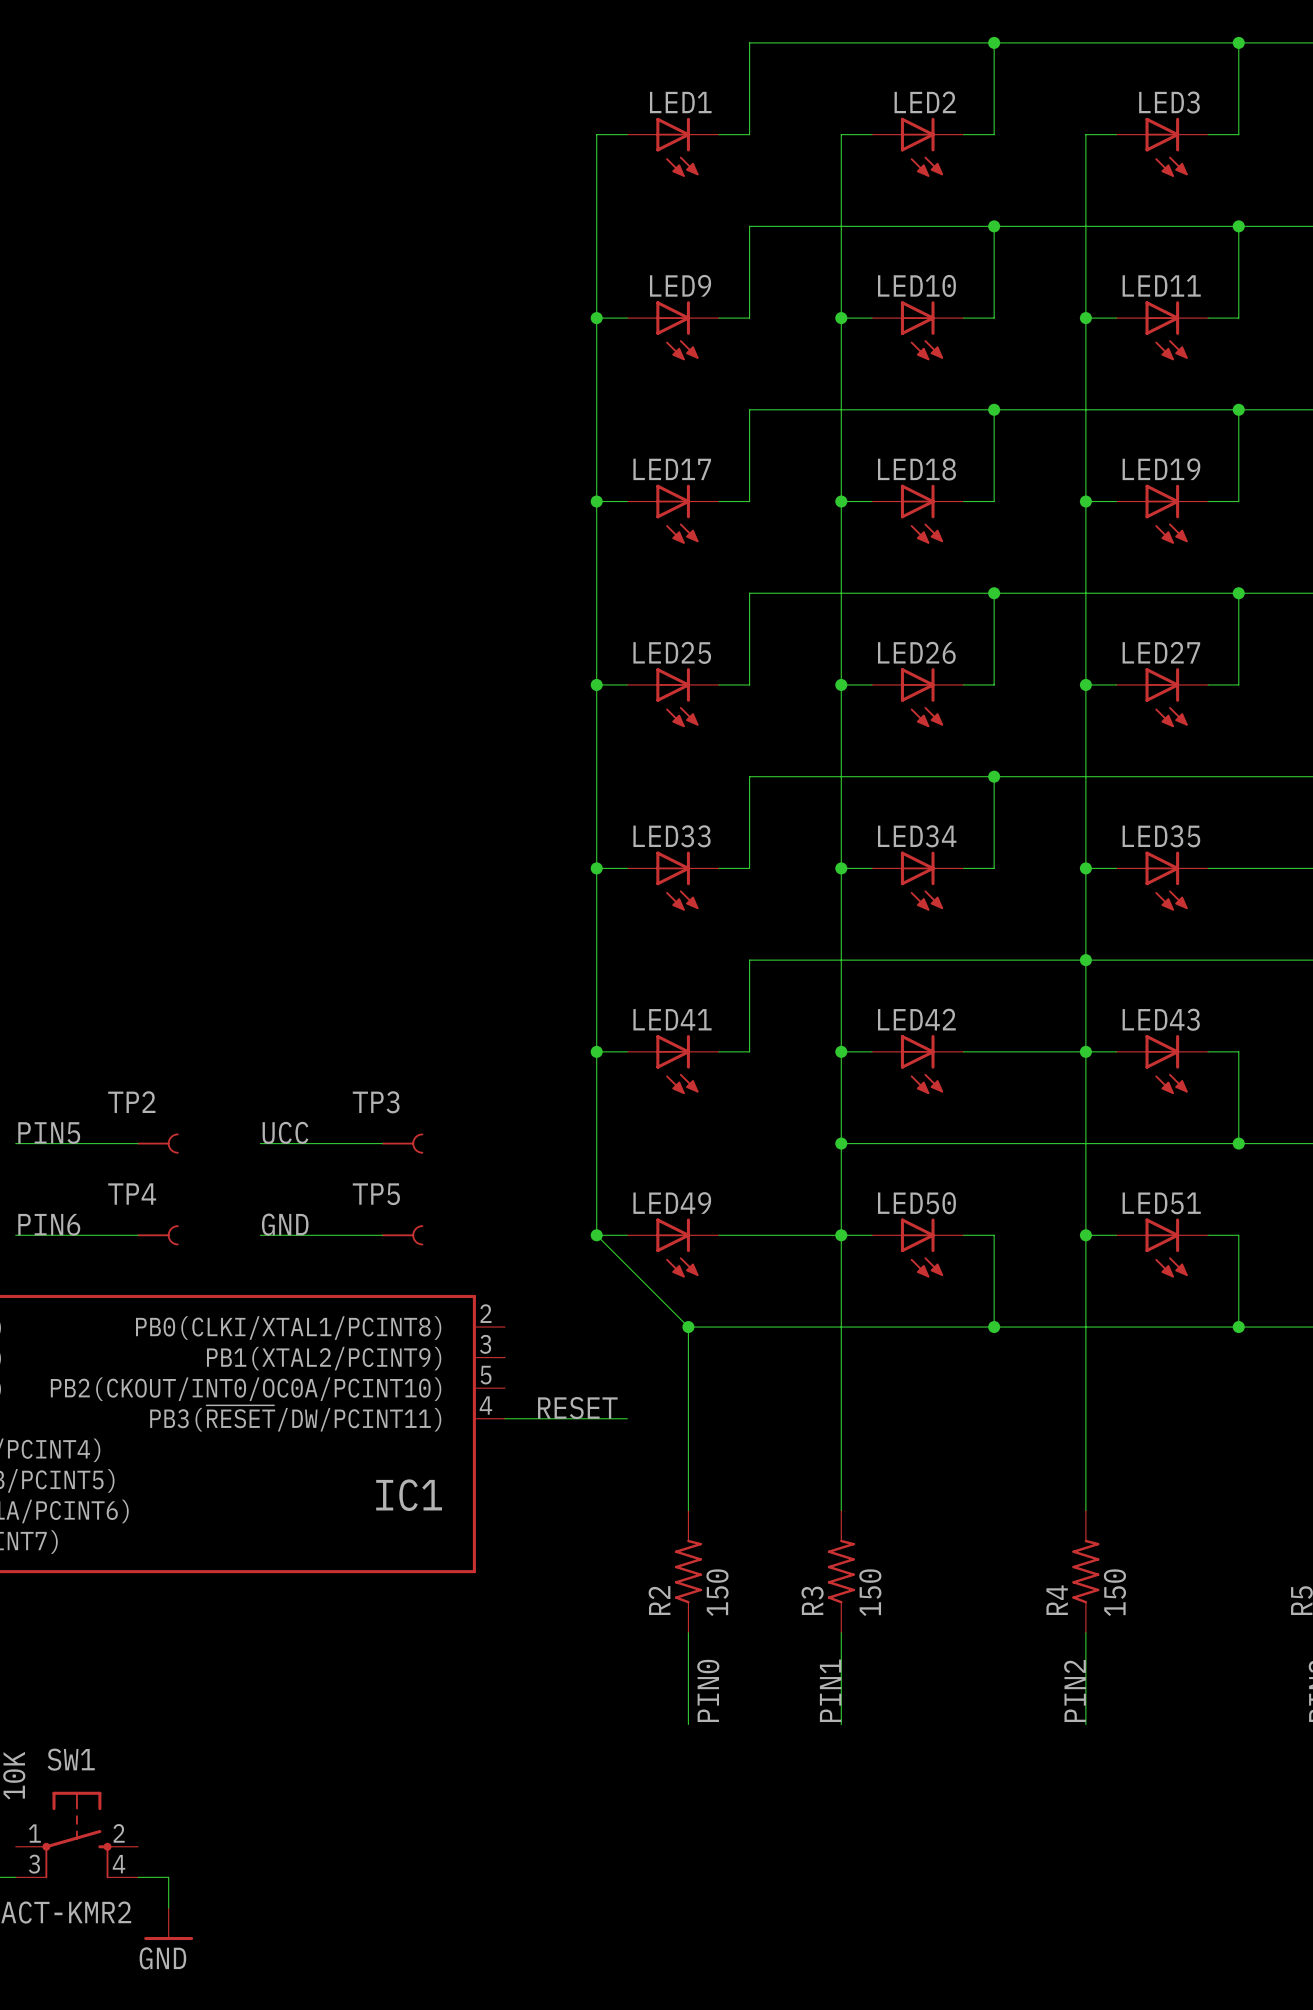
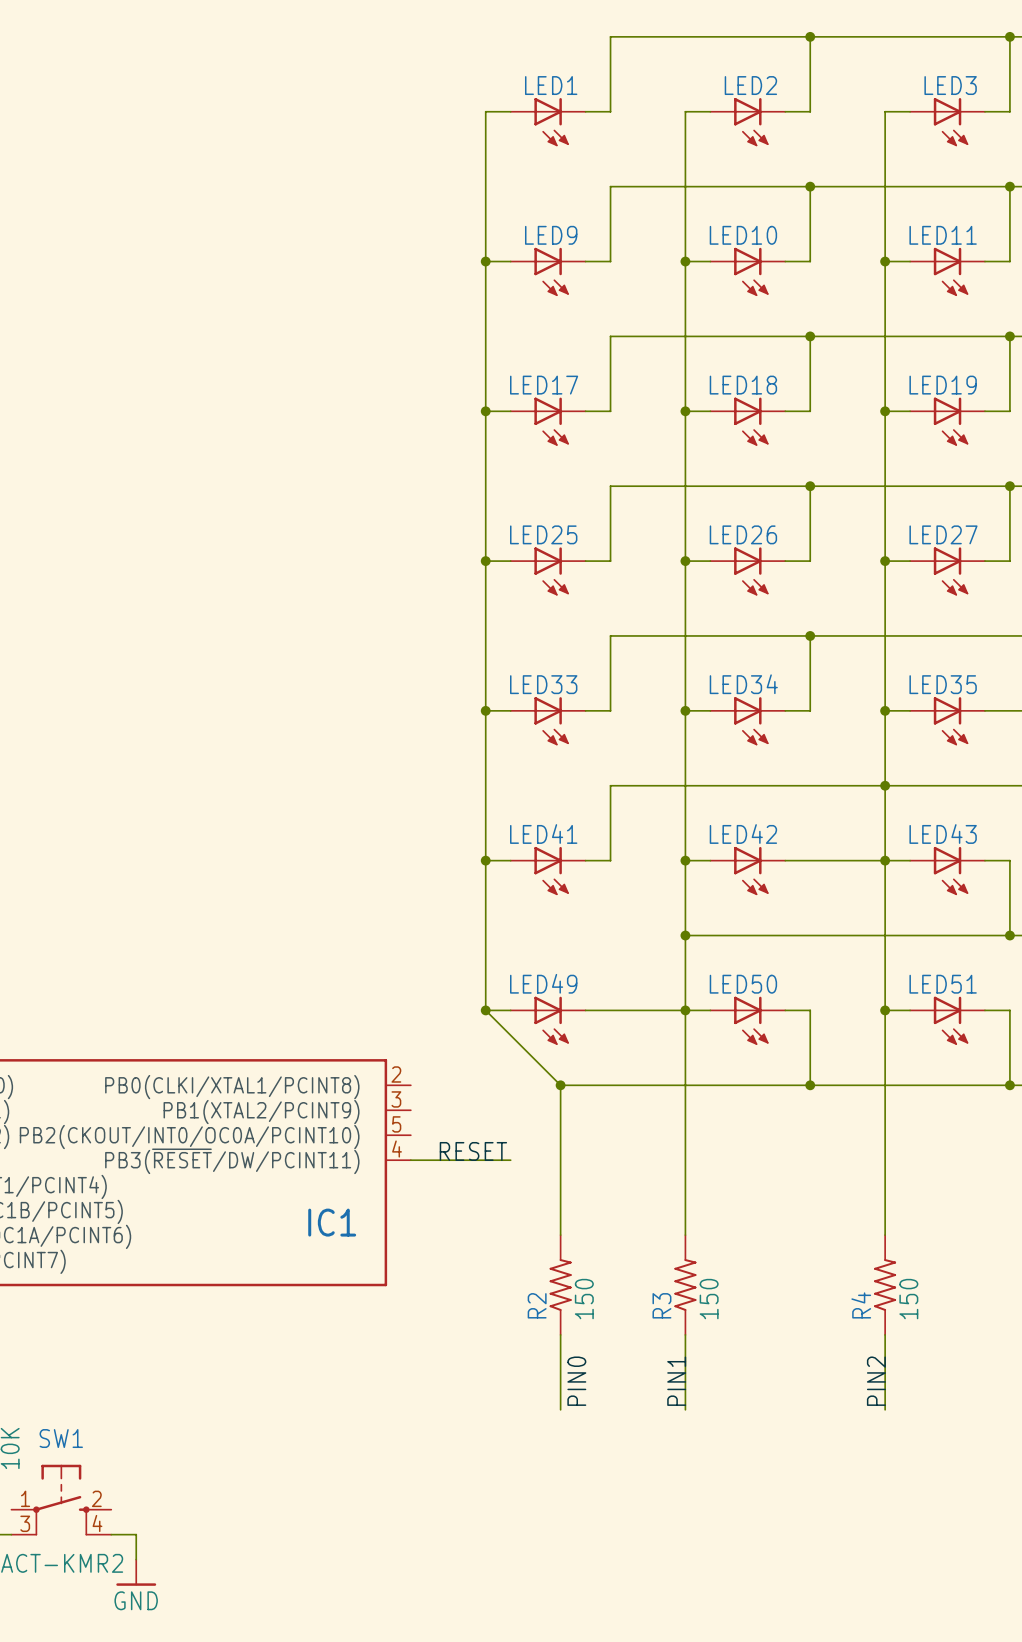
label: UCC (285, 1132) -> none
label: PIN5 (49, 1133) -> none
wire: (15, 1143) (138, 1143) -> none
TP2: (157, 1143) -> none
wire: (260, 1143) (382, 1143) -> none
TP3: (402, 1143) -> none
label: PIN6 (49, 1224) -> none
label: GND (285, 1224) -> none
wire: (15, 1235) (138, 1235) -> none
TP4: (157, 1235) -> none
wire: (260, 1235) (382, 1235) -> none
TP5: (402, 1235) -> none

